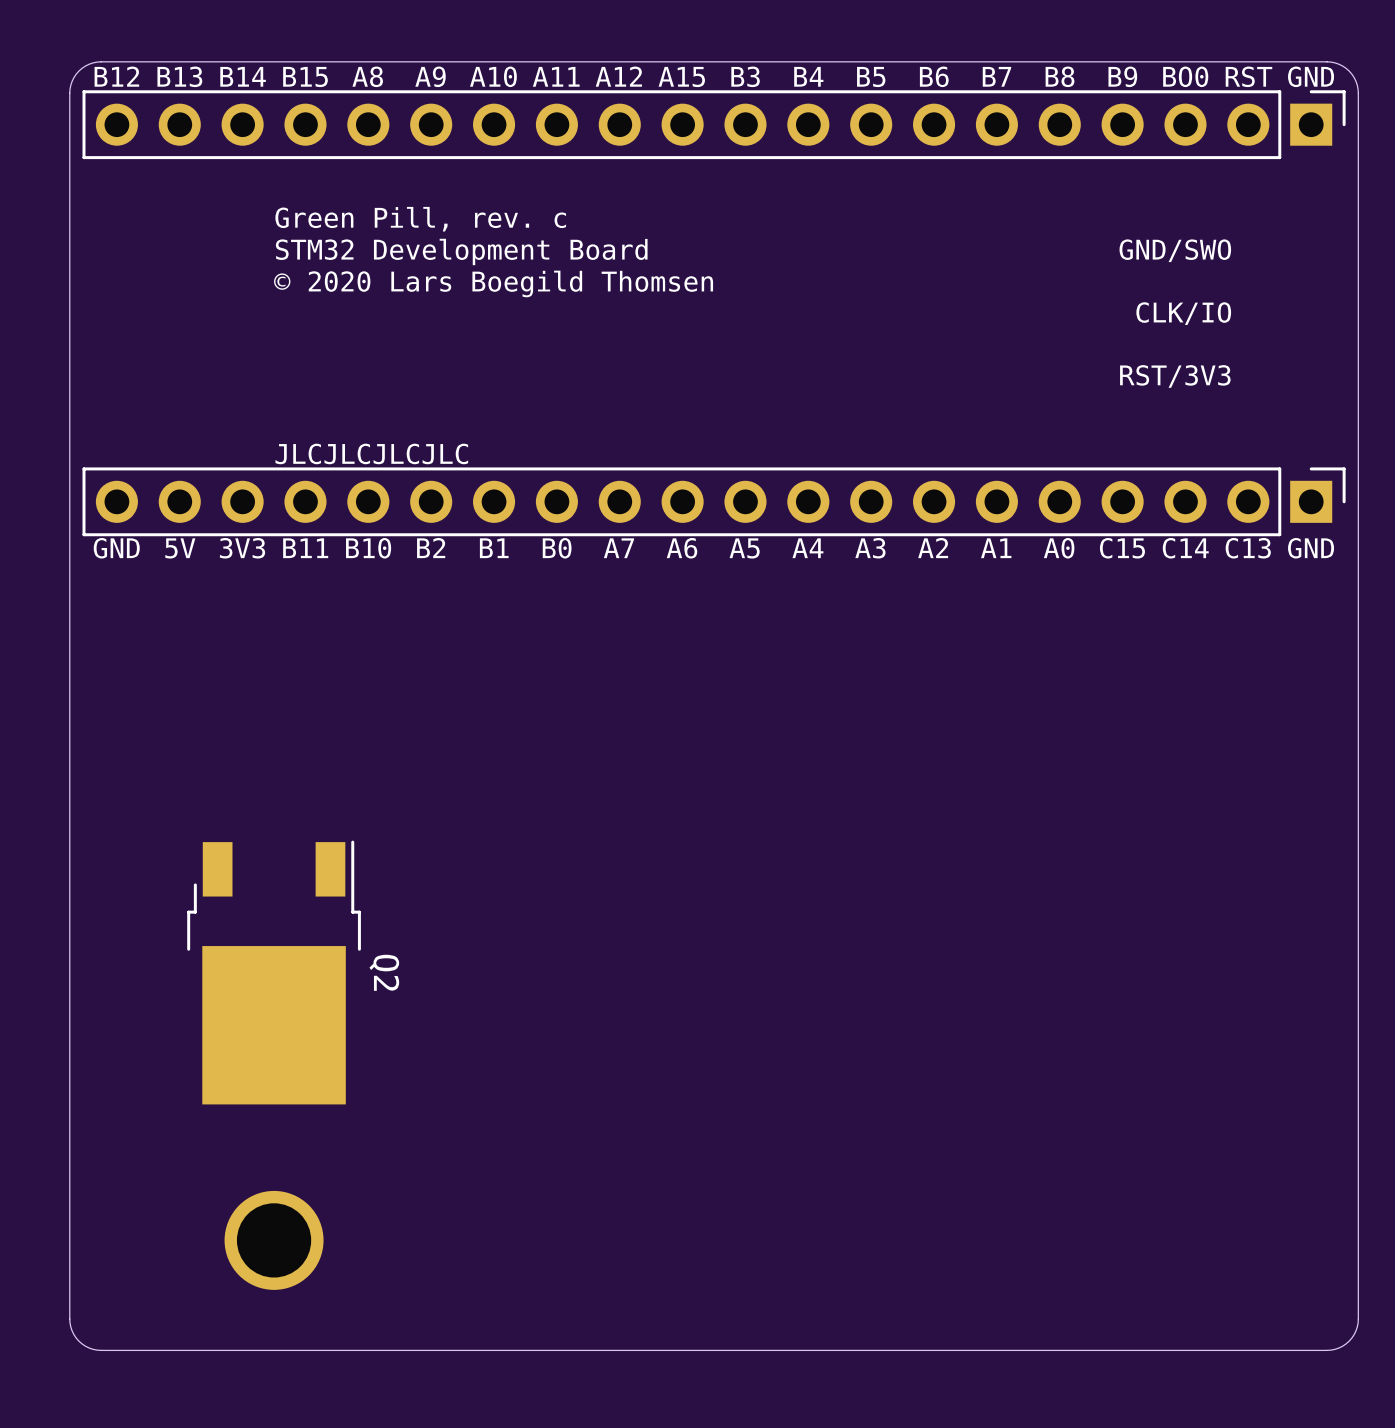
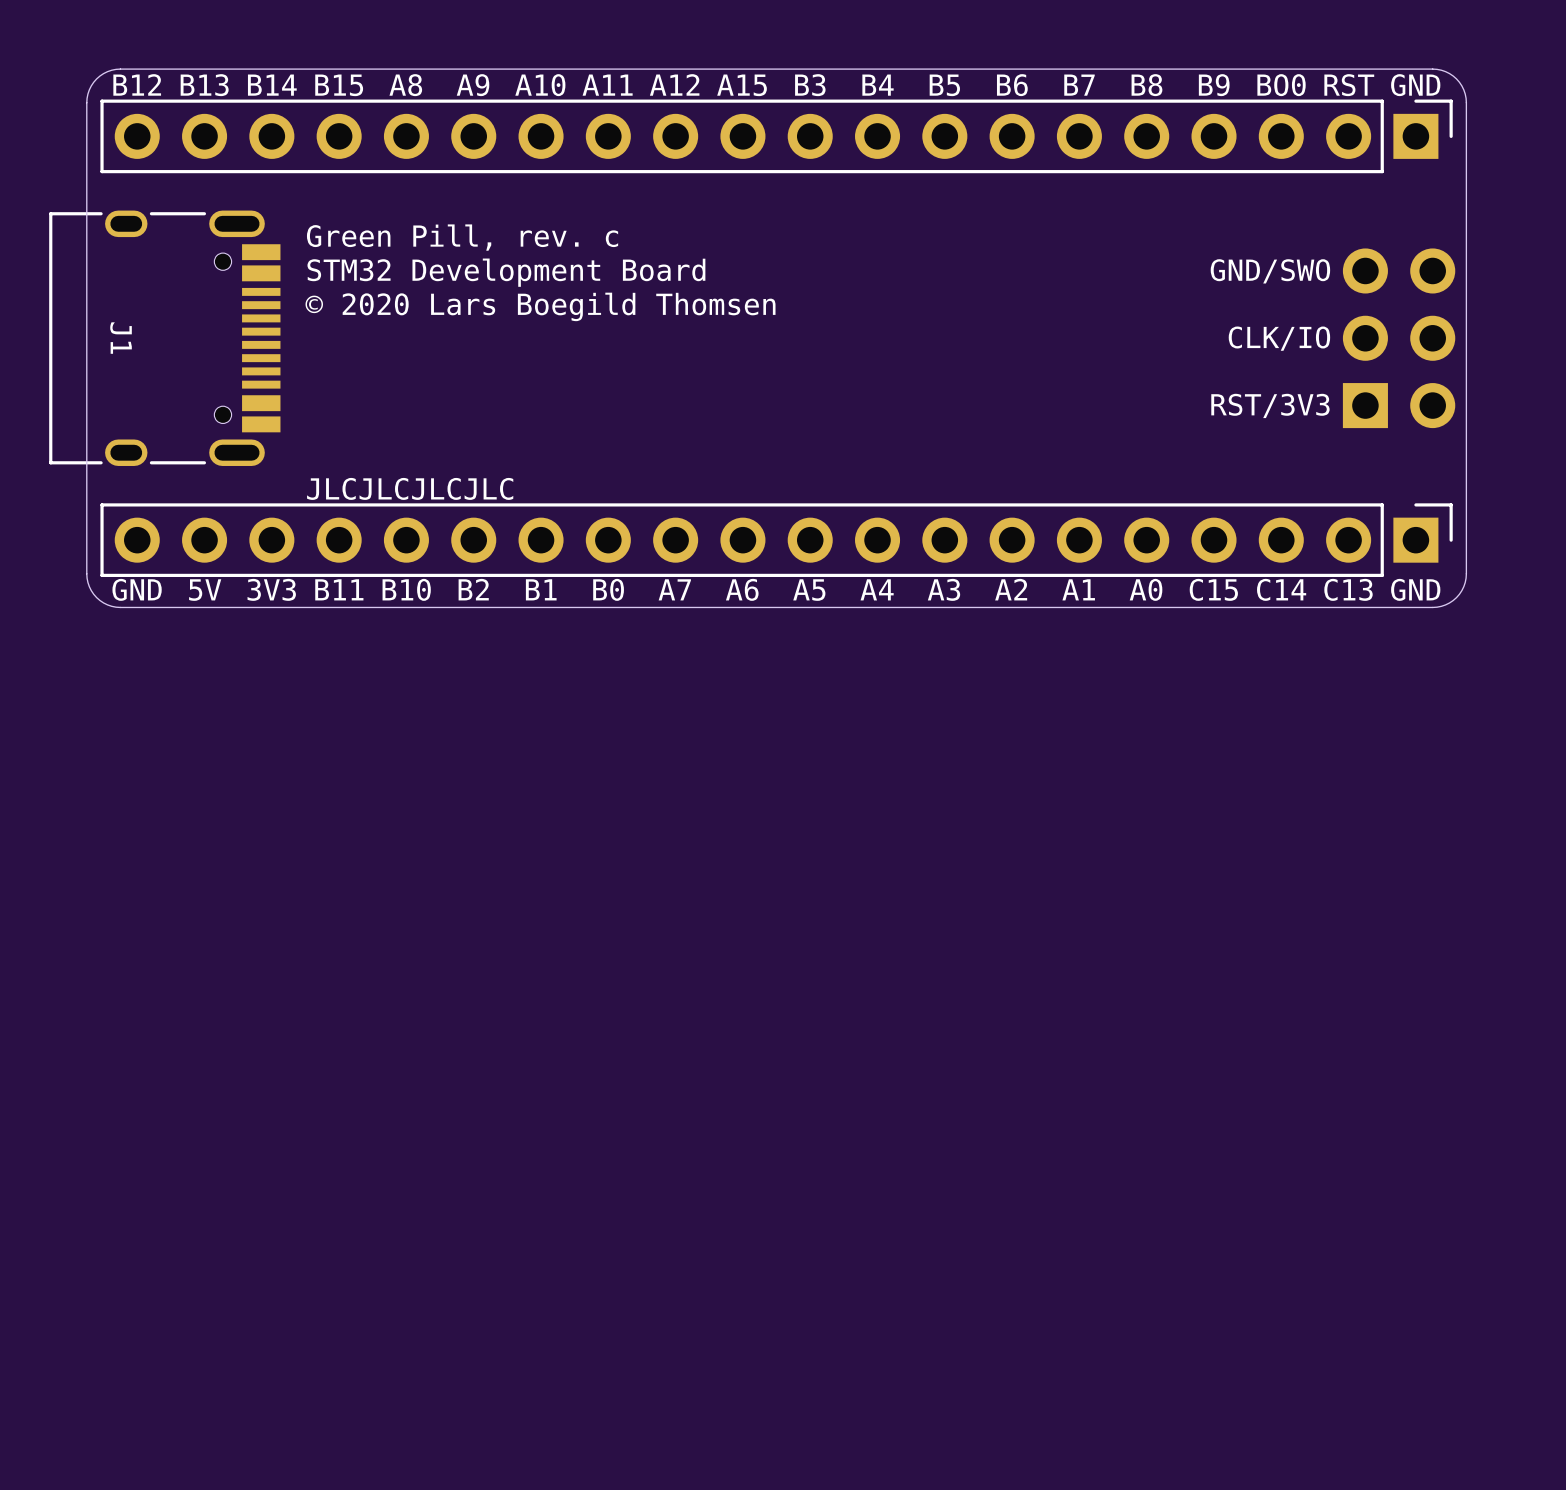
J1: none -> (164, 338)
part: none -> (1399, 338)
board edge: (69, 533) (69, 1318) -> none
board edge: (1358, 533) (1358, 1318) (1354, 1334) (1342, 1346) (1326, 1350) (101, 1350) (89, 1348) (78, 1341) (72, 1331) (69, 1318) -> (1466, 573) (1463, 586) (1456, 597) (1445, 604) (1432, 607) (120, 607) (107, 604) (96, 597) (89, 586) (86, 573)
Q2: (274, 972) -> none
part: (274, 1240) -> none

